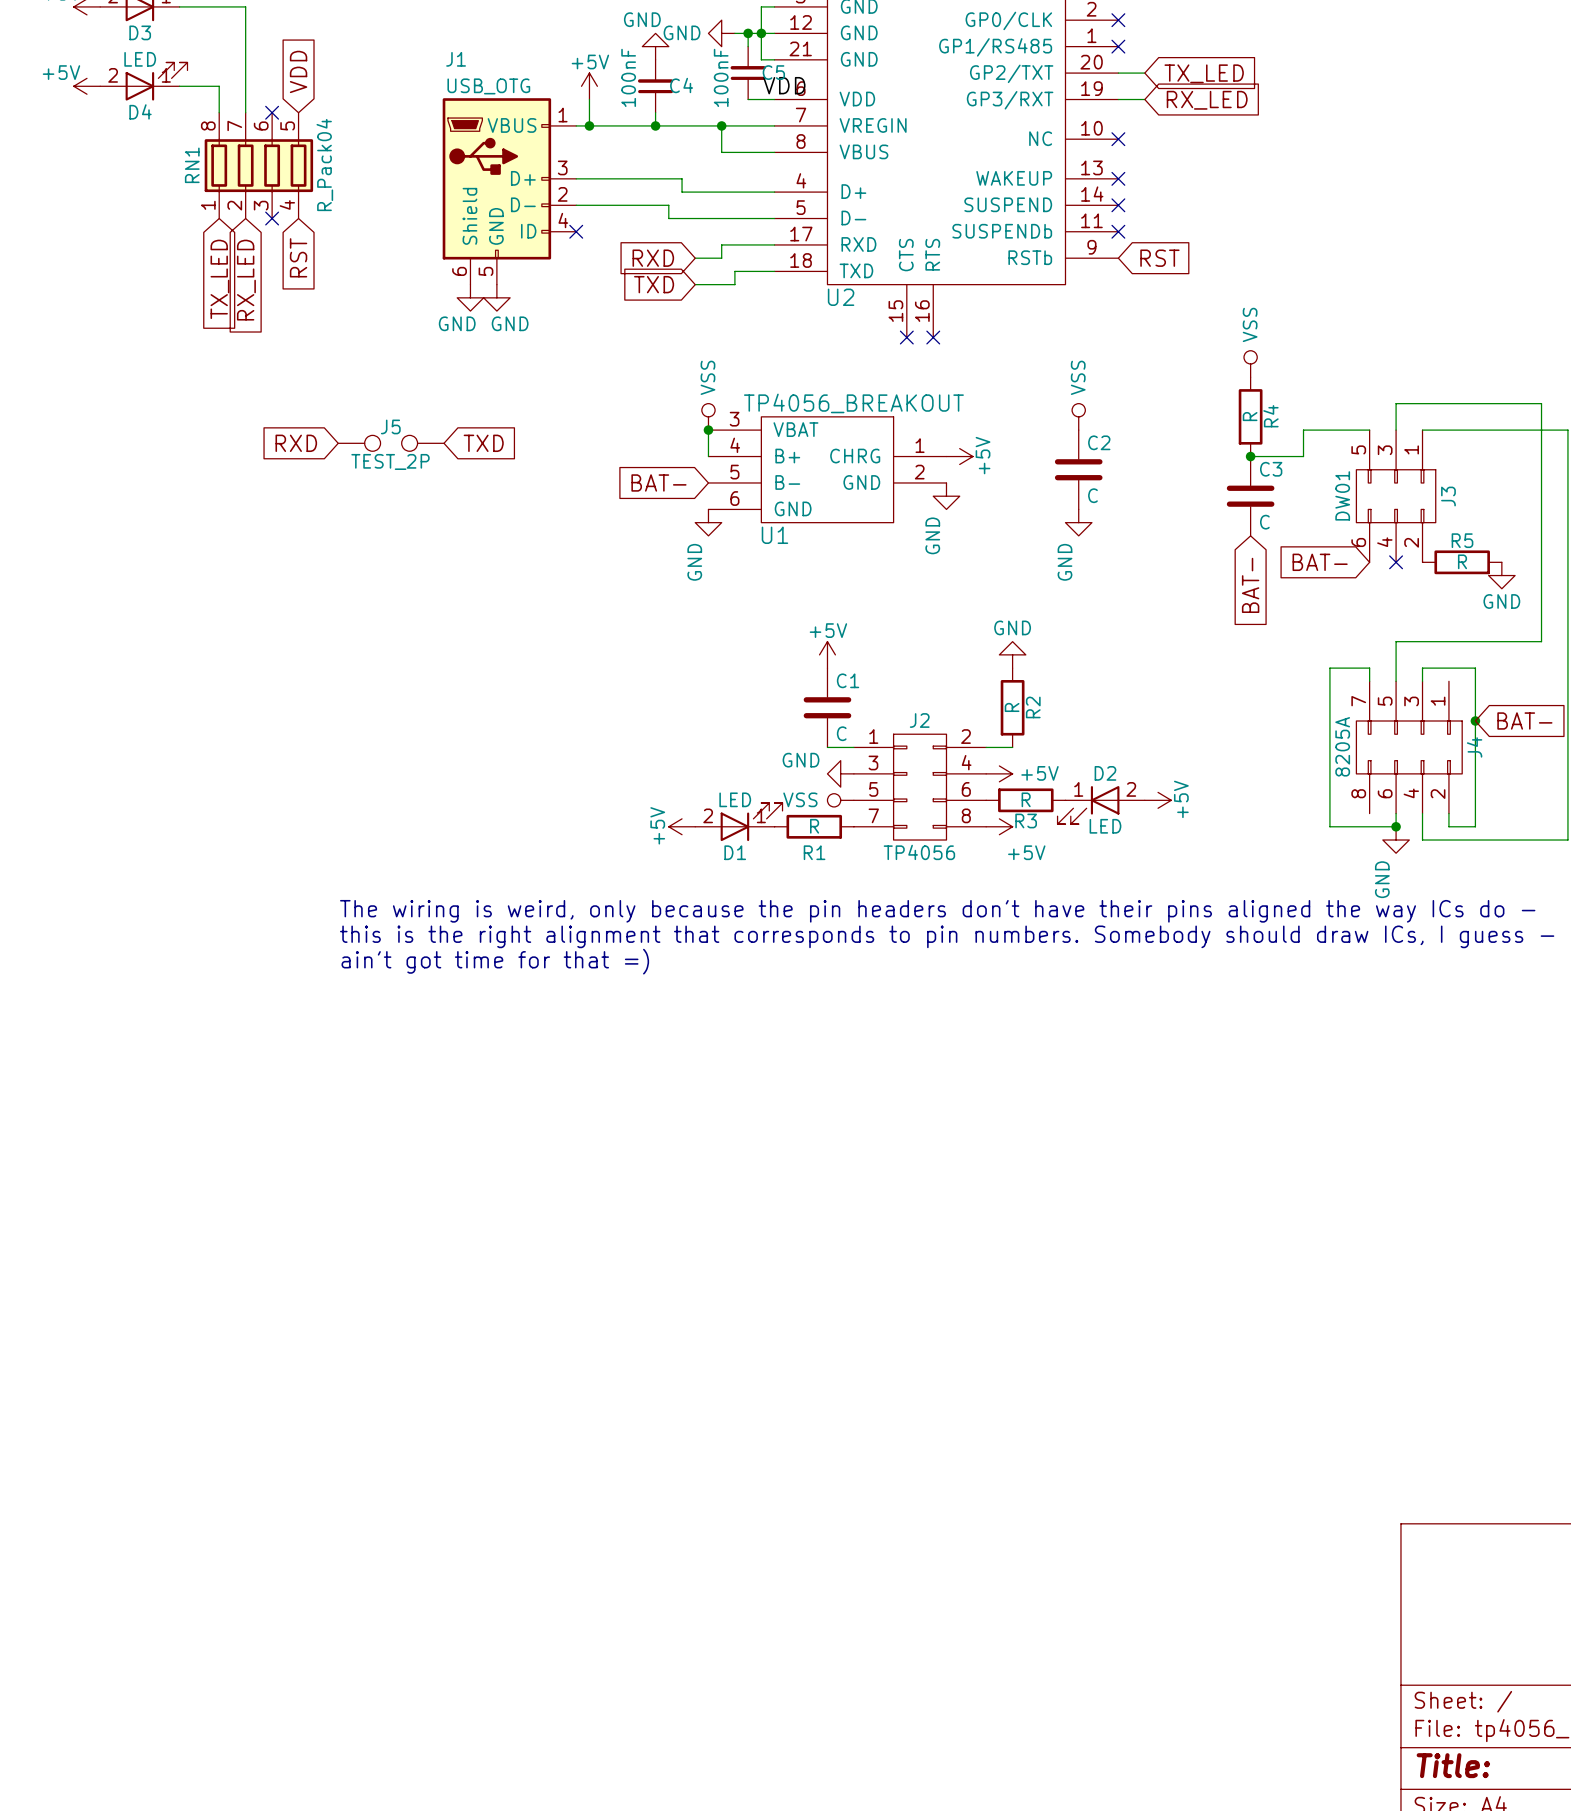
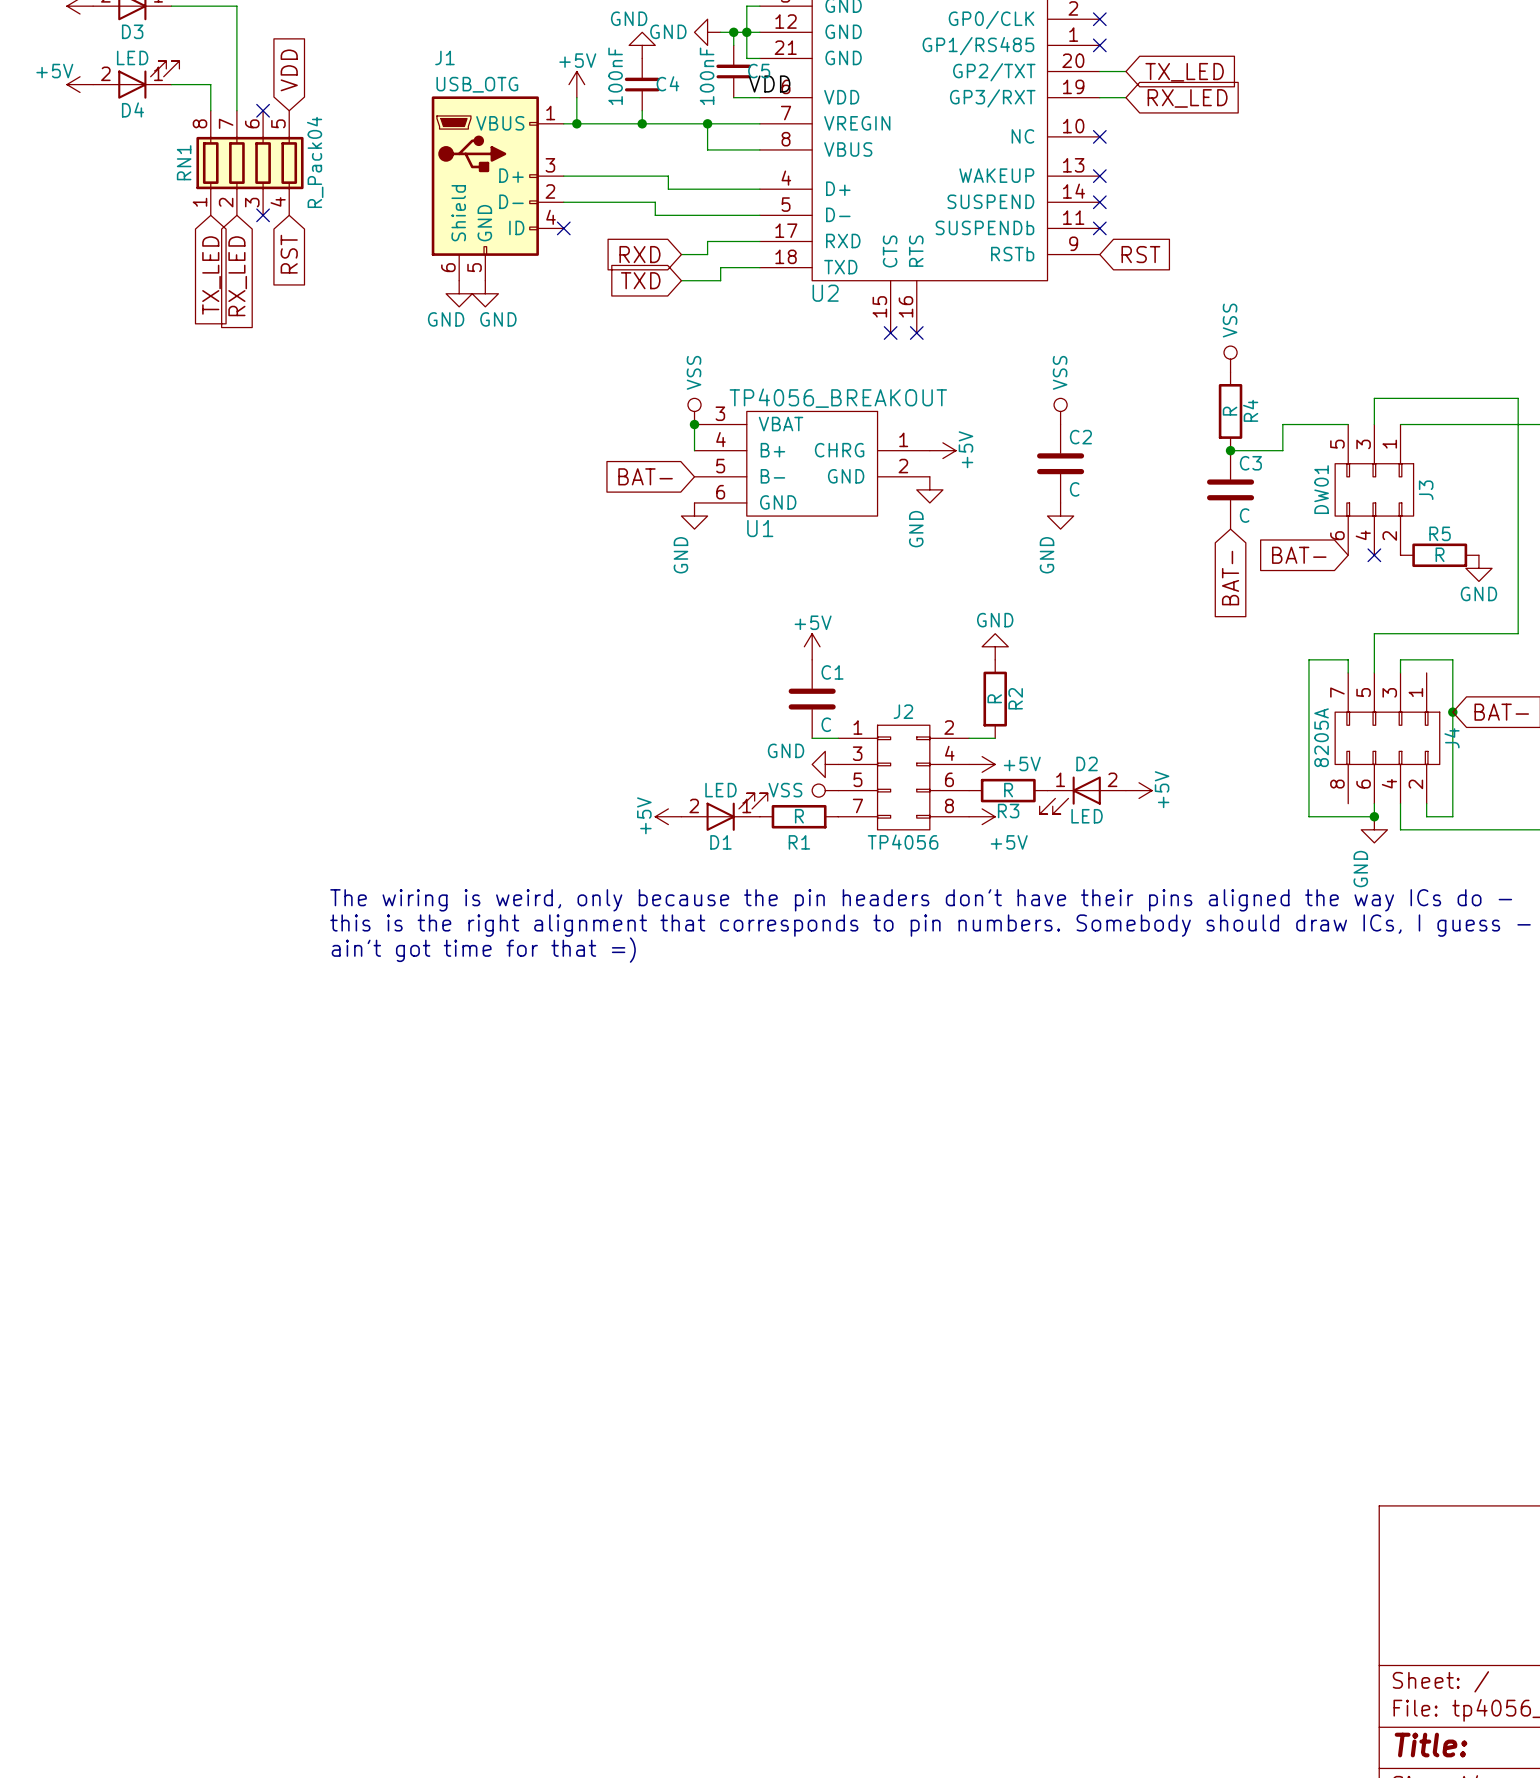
global label: RXD (296, 443) -> none
J5: TEST_2P (391, 443) -> none
global label: TXD (483, 443) -> none

